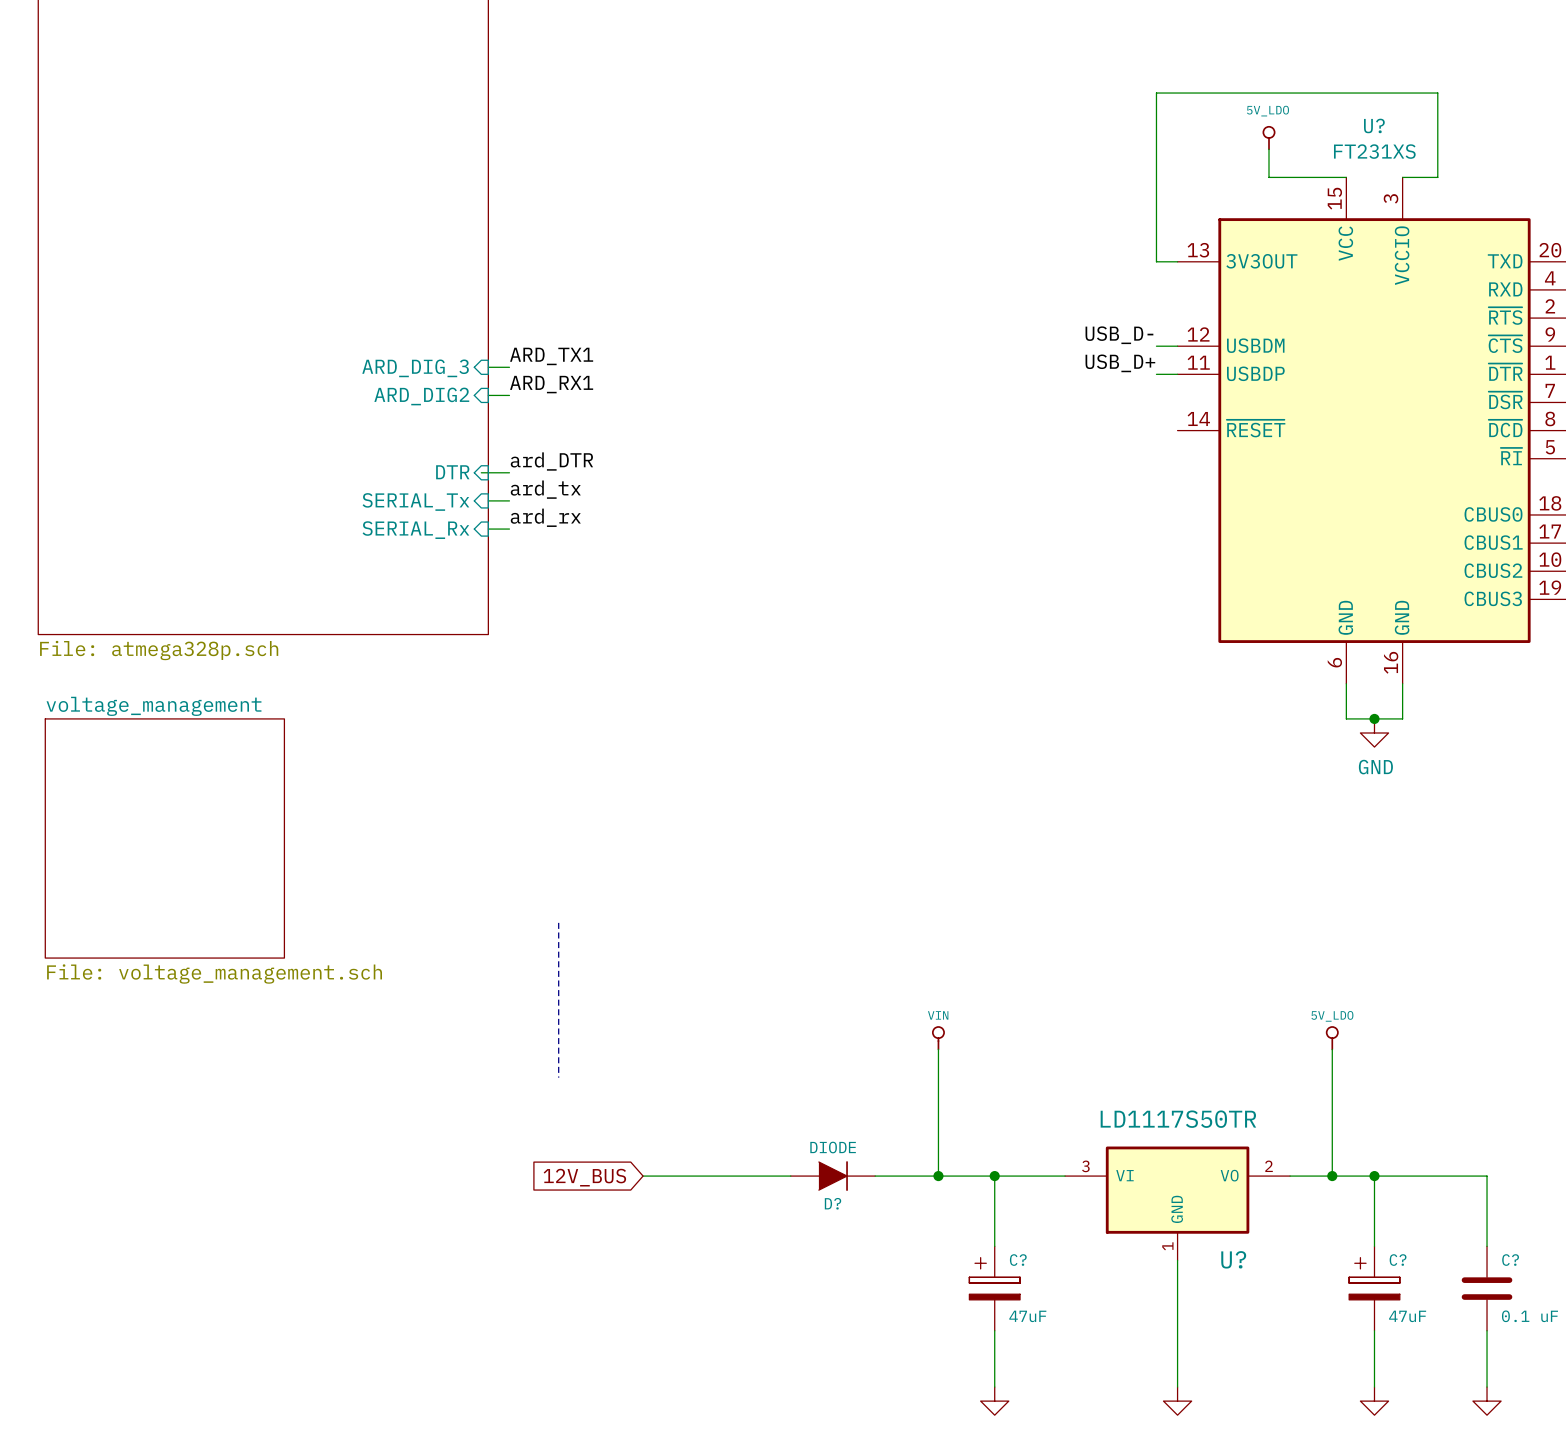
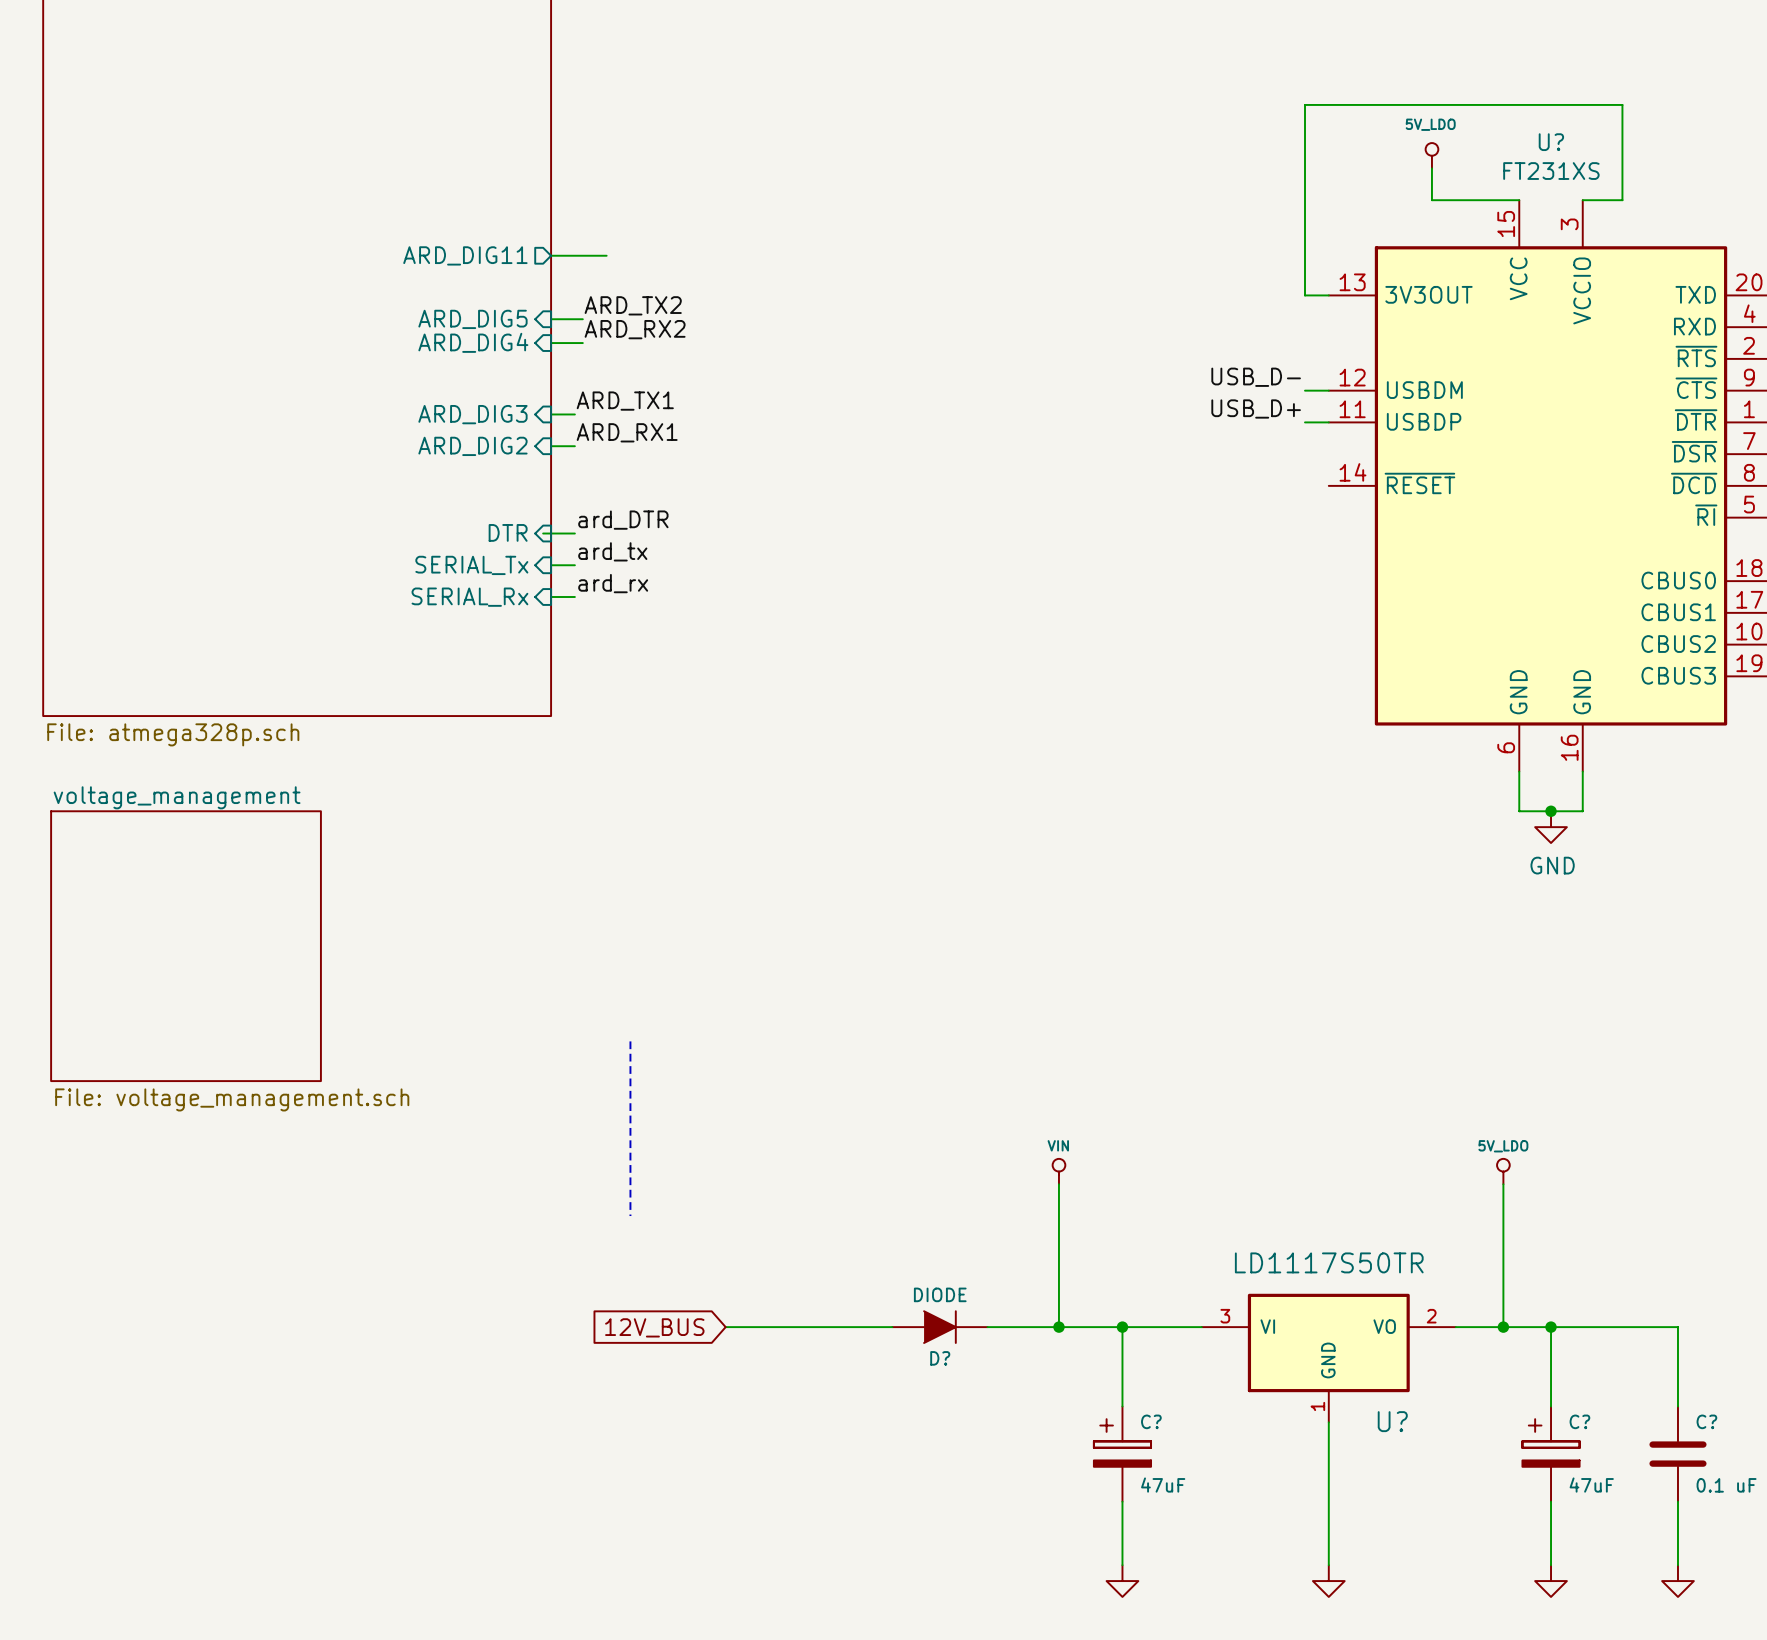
wire: none -> (551, 255) (606, 255)
sheet pin: none -> ARD_DIG11 (465, 255)
label: none -> ARD_TX2 (633, 305)
wire: none -> (551, 319) (582, 319)
sheet pin: none -> ARD_DIG5 (472, 319)
label: none -> ARD_RX2 (635, 329)
wire: none -> (551, 343) (582, 343)
sheet pin: none -> ARD_DIG4 (473, 342)
sheet pin: ARD_DIG_3 (415, 368) -> ARD_DIG3 (472, 414)

